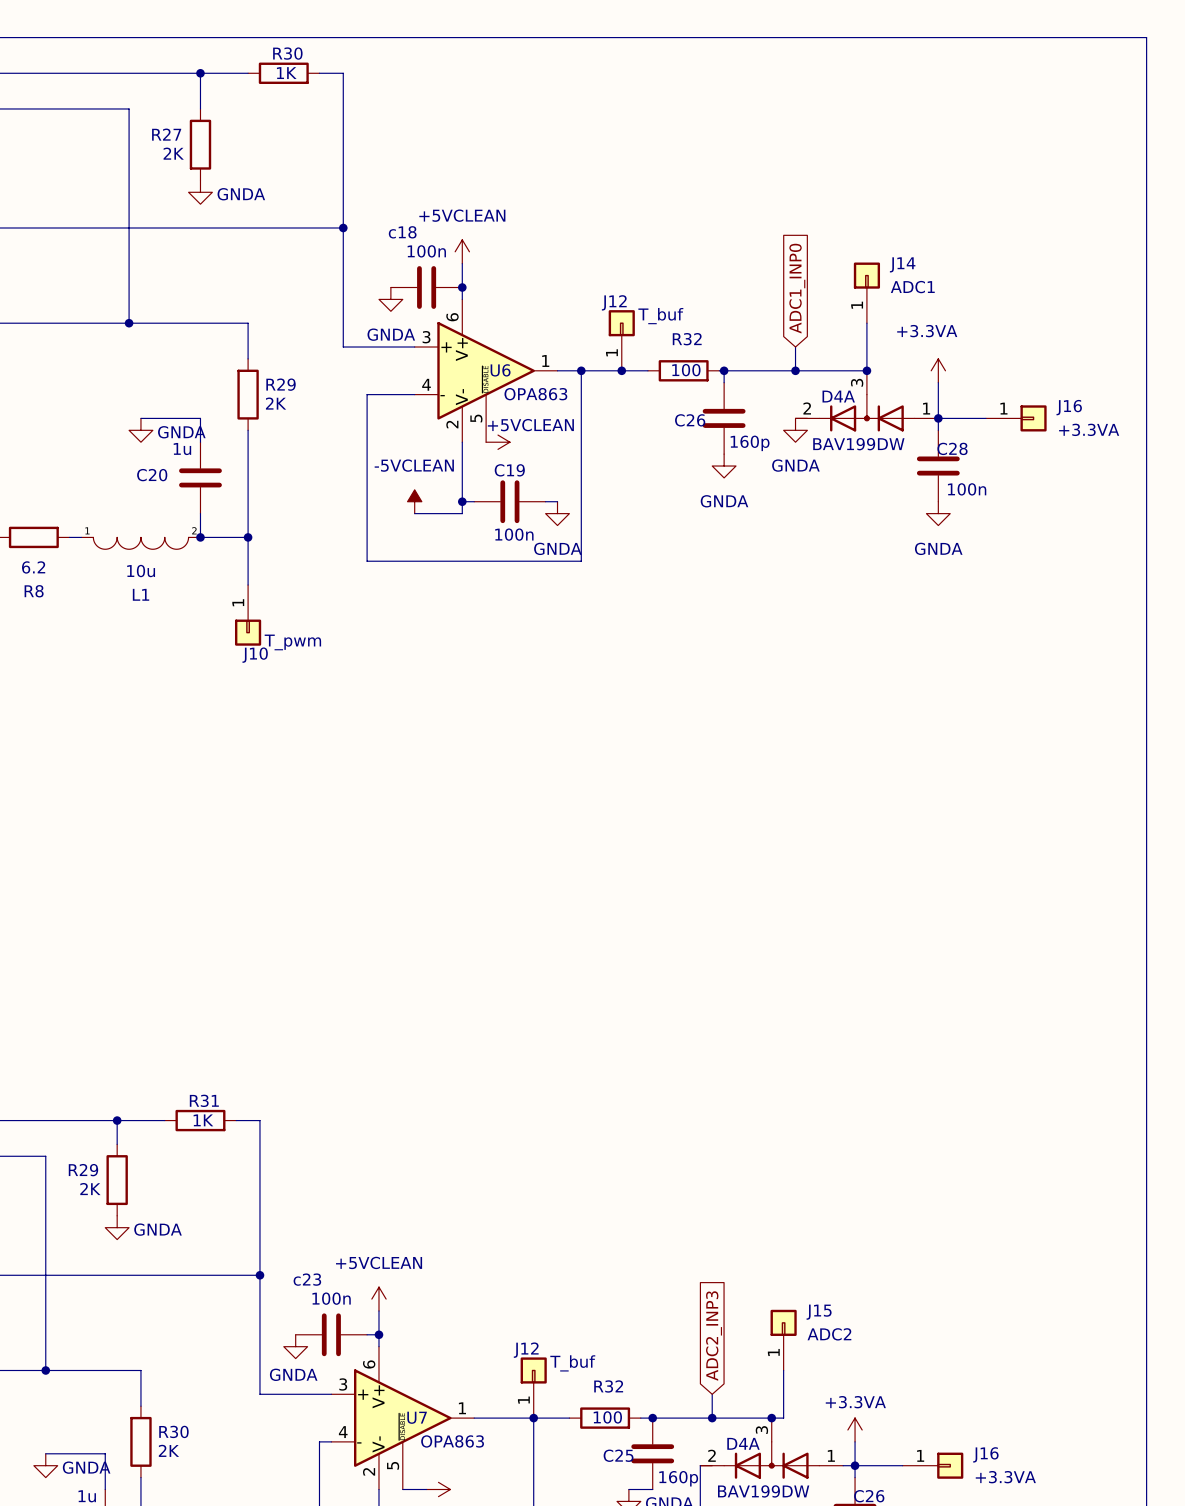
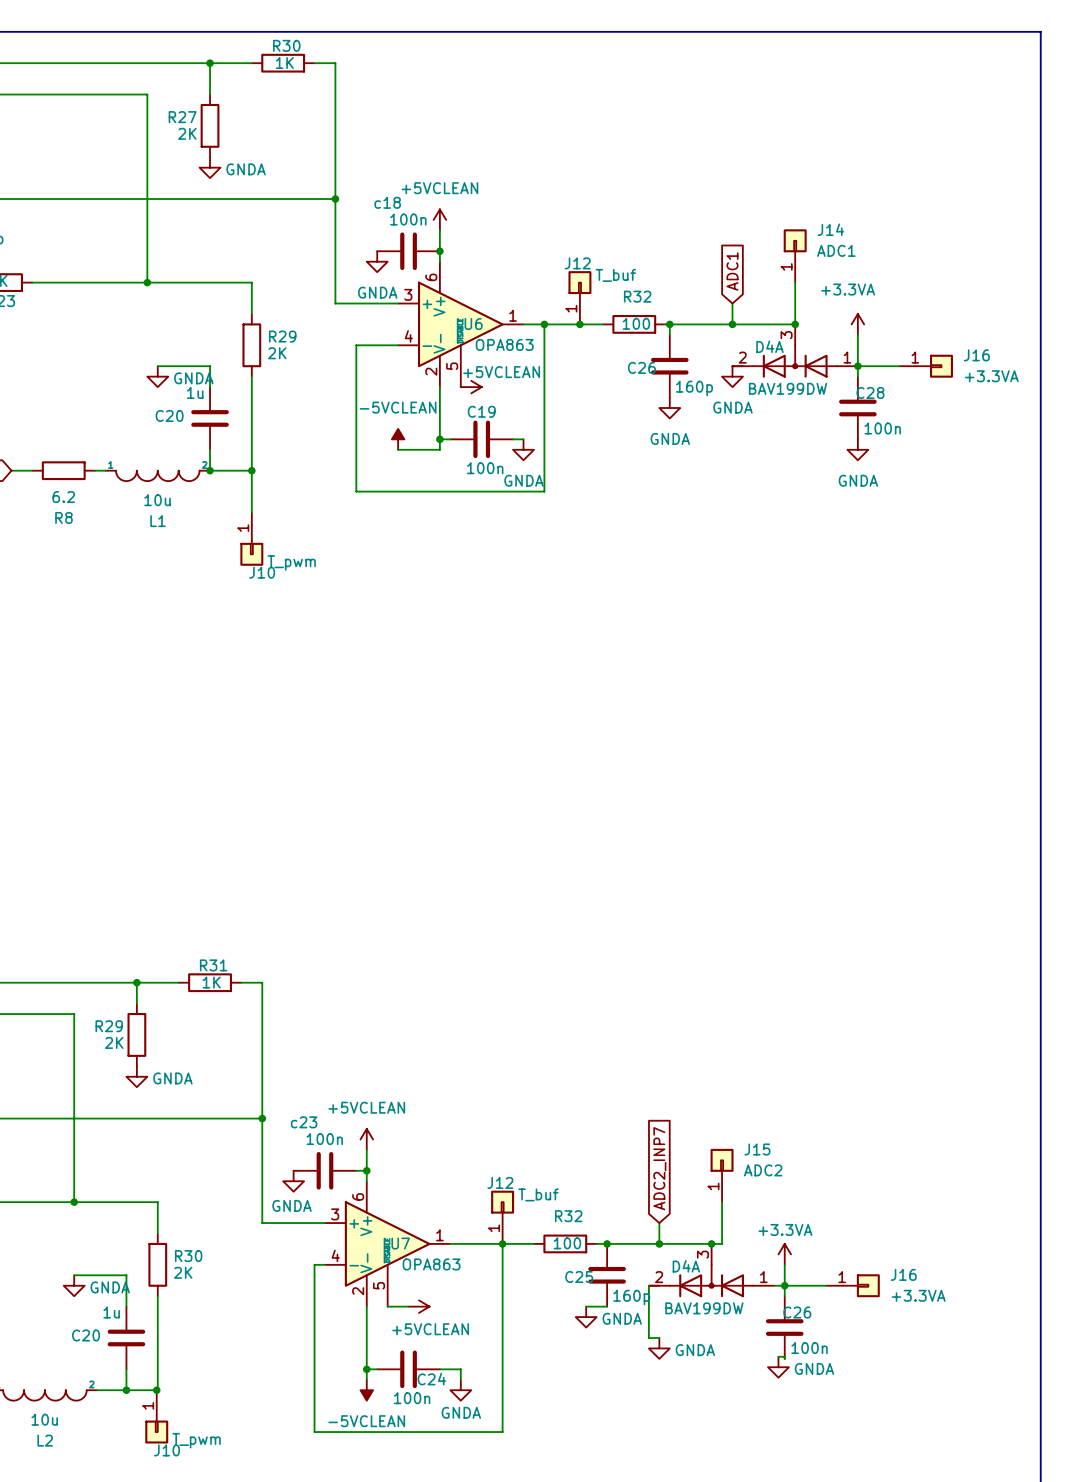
global label: ADC1_INP0 (797, 288) -> ADC1 (732, 271)
global label: ADC2_INP3 (714, 1336) -> ADC2_INP7 (659, 1168)

